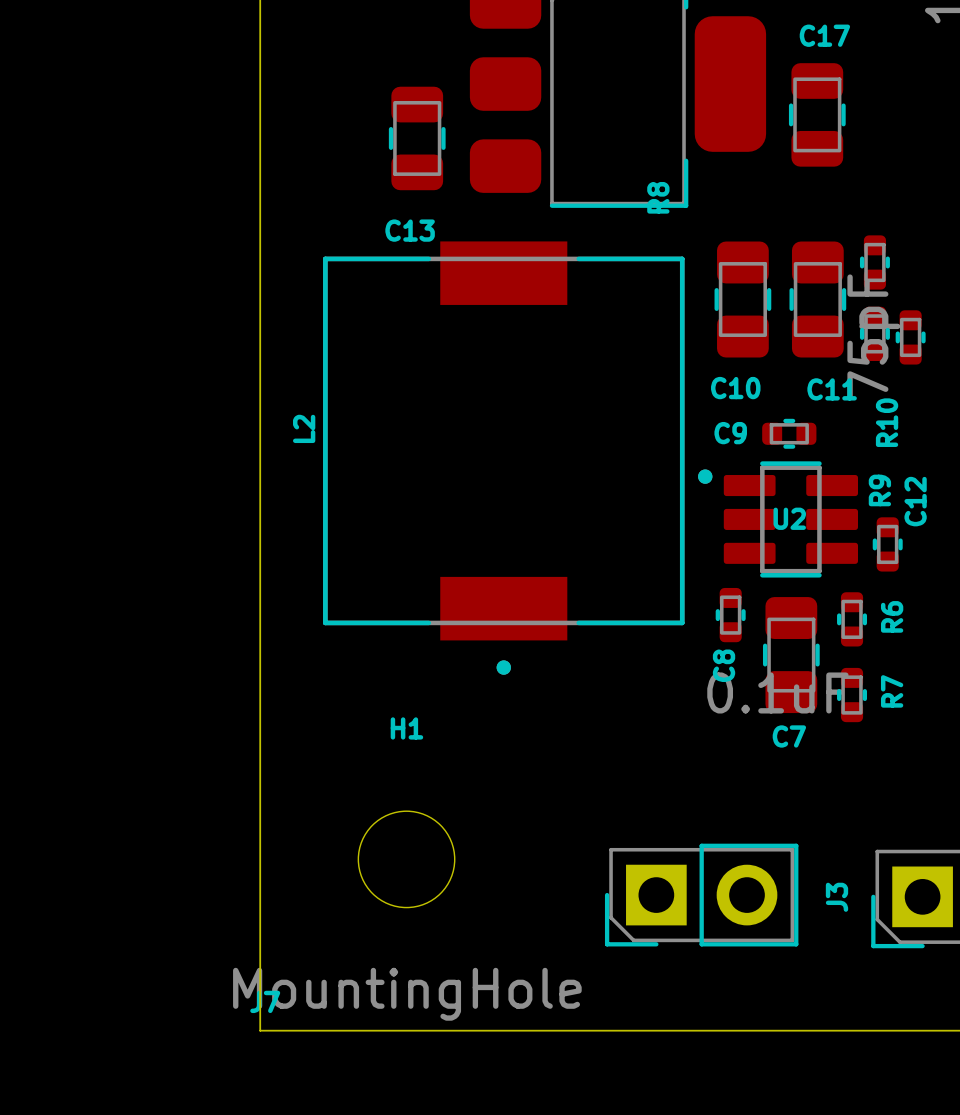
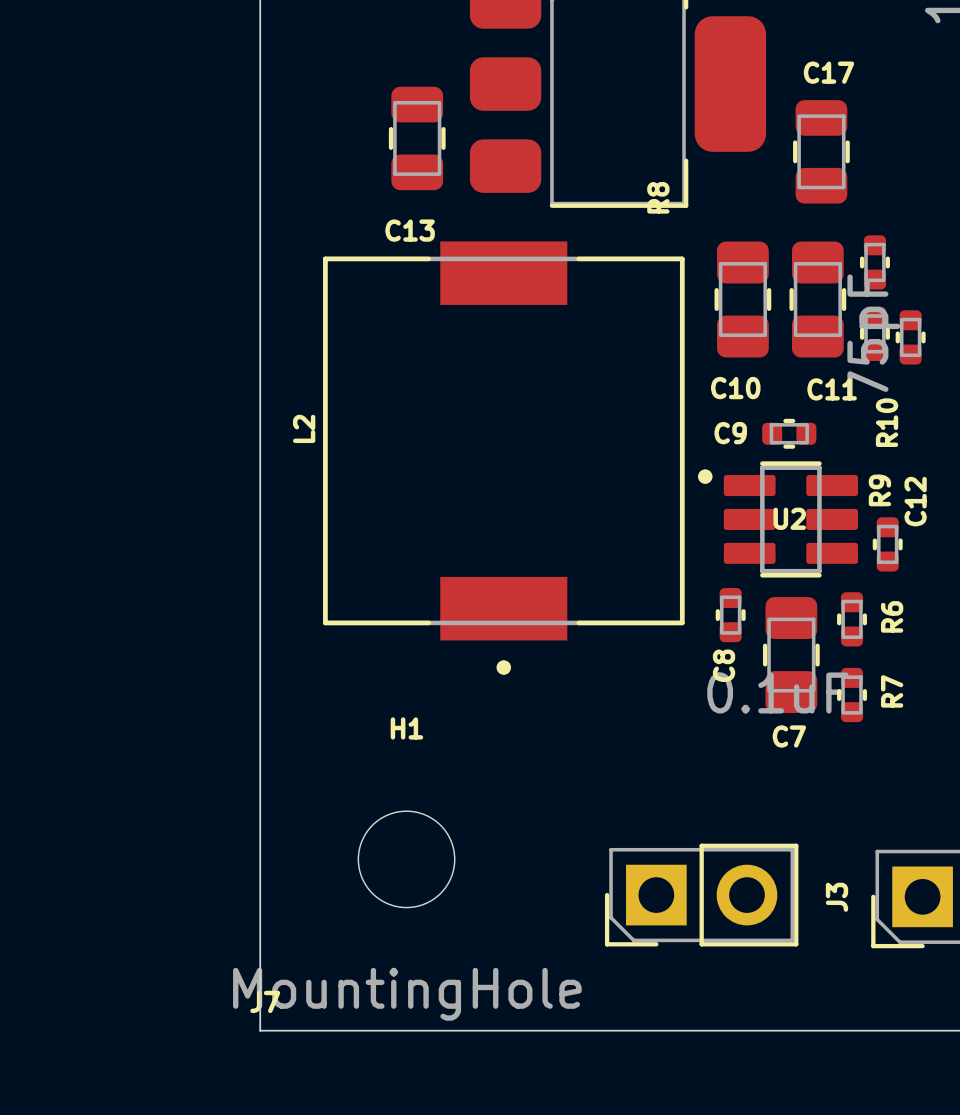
C17 position: (817, 114) -> (821, 151)

